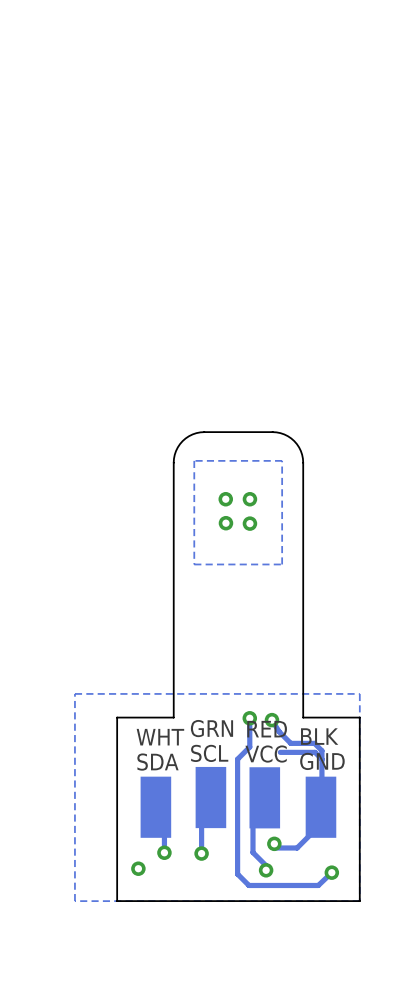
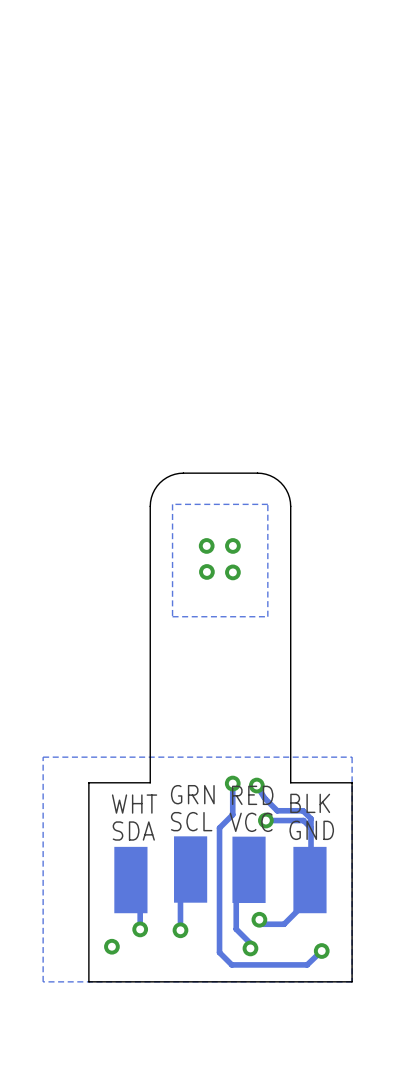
via: none -> (265, 820)

